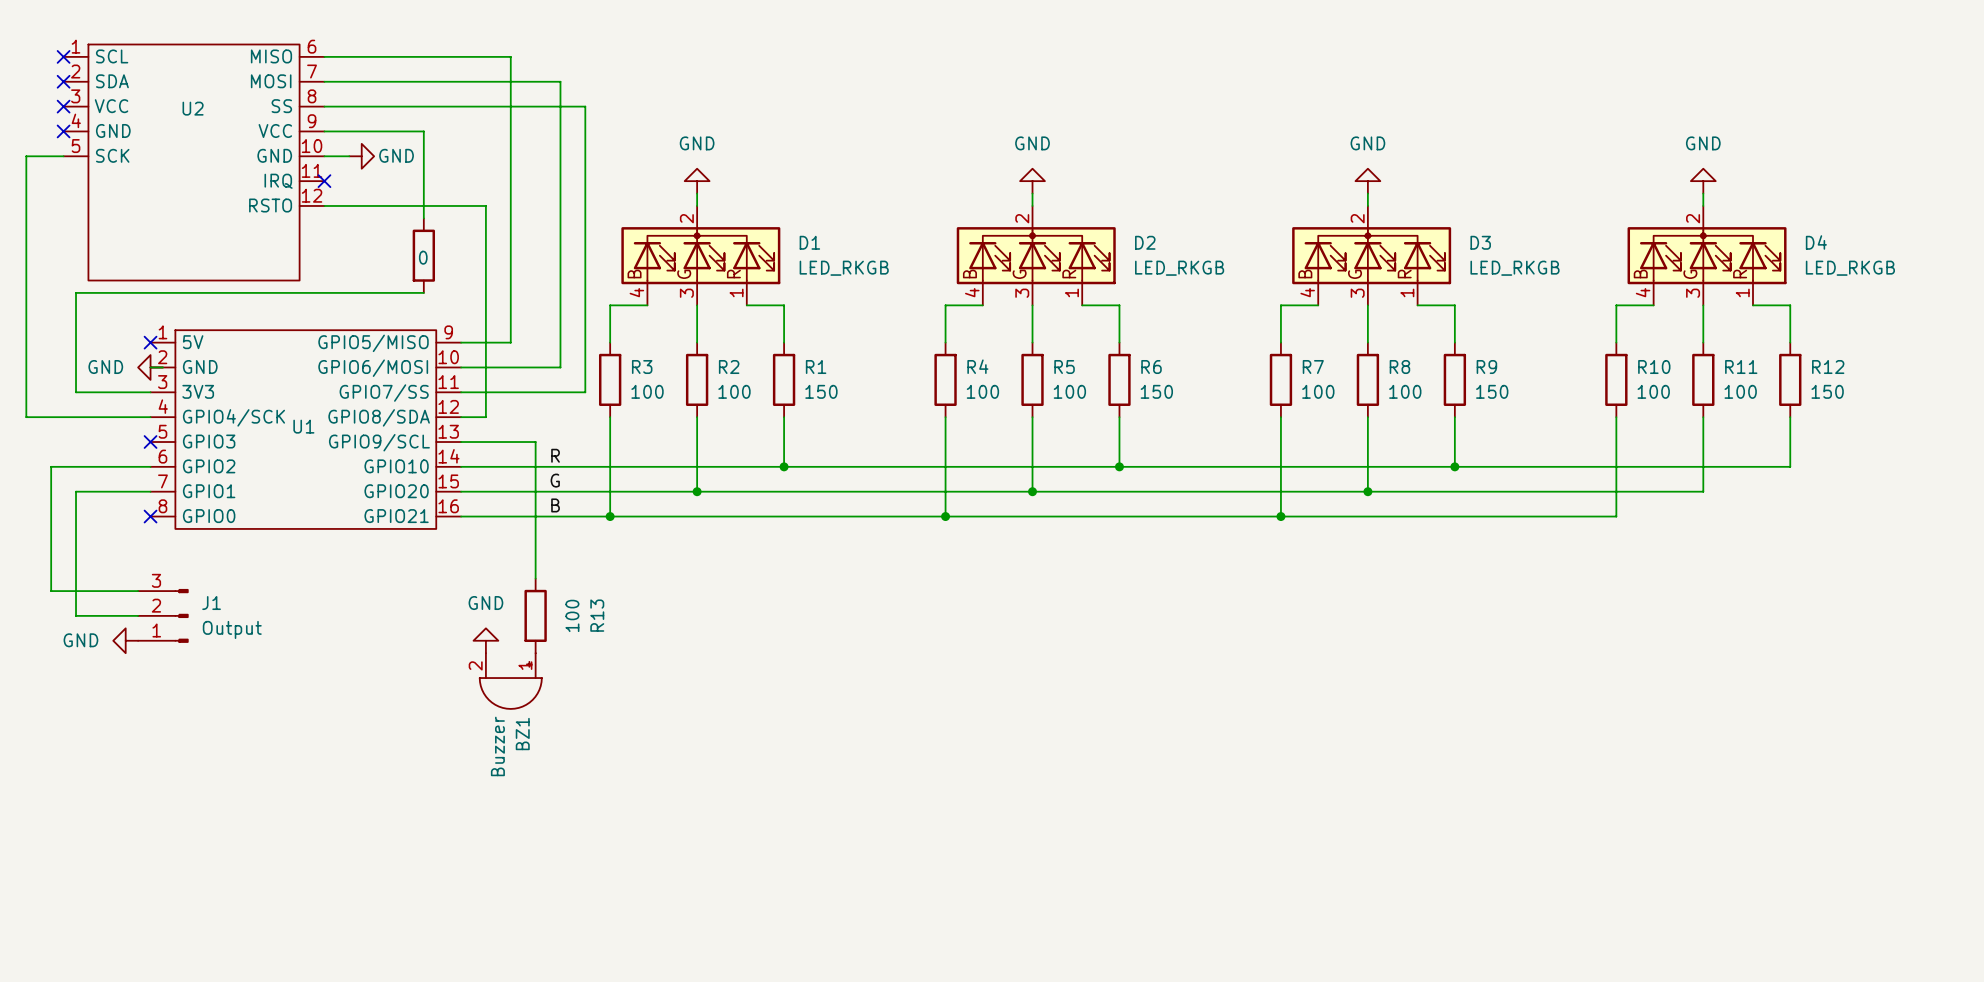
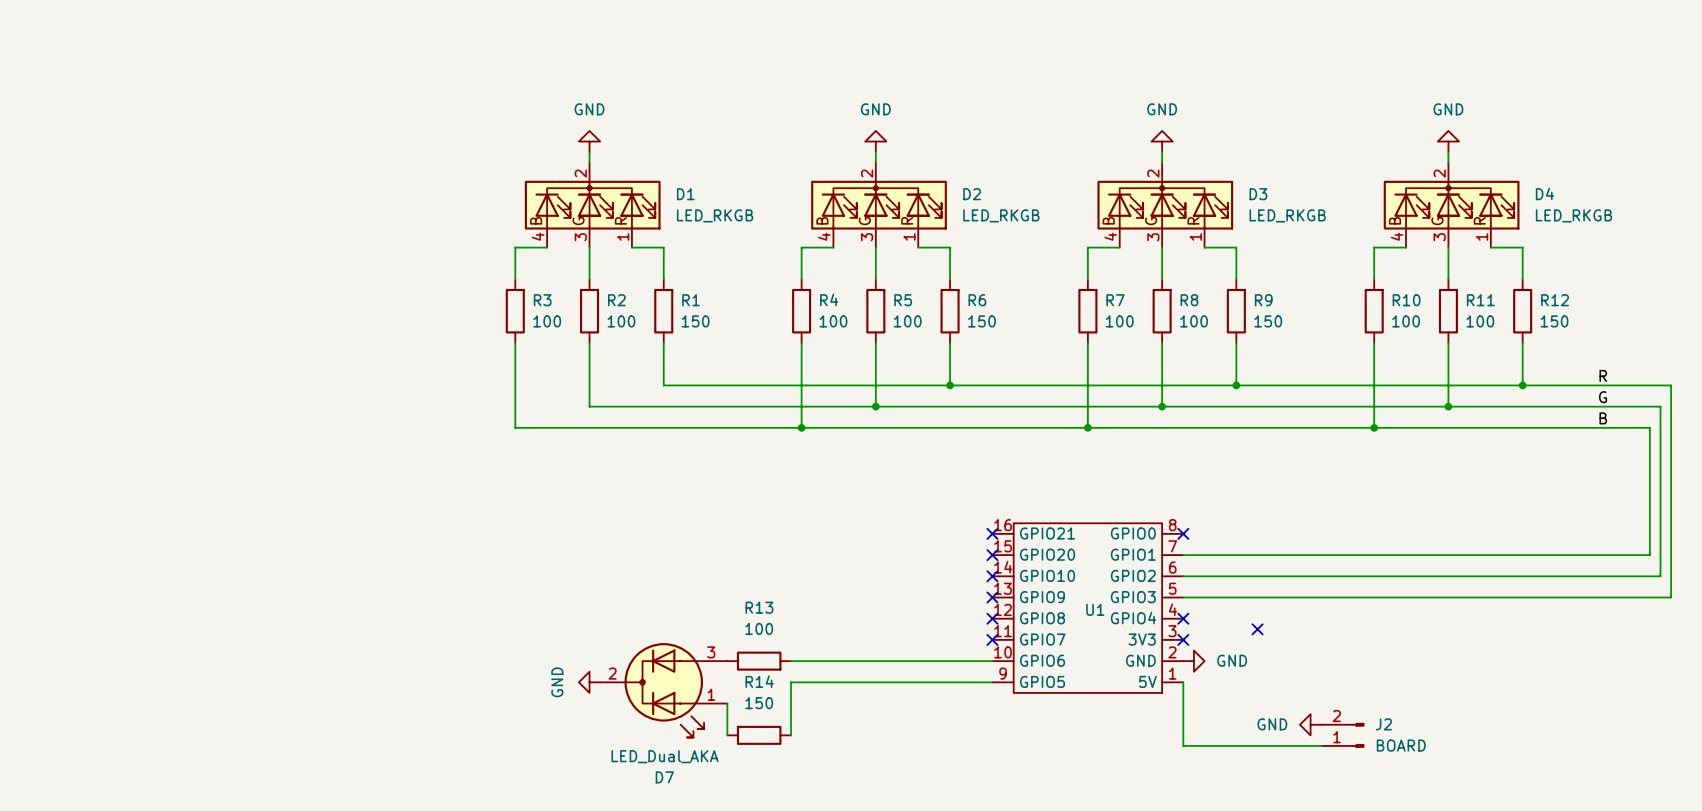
no-connect mark: (63, 56) -> none
wire: (324, 56) (510, 56) (510, 342) (461, 342) -> none
no-connect mark: (63, 81) -> none
wire: (324, 81) (560, 81) (560, 367) (461, 367) -> none
no-connect mark: (63, 106) -> none
wire: (324, 106) (585, 106) (585, 392) (461, 392) -> none
no-connect mark: (63, 131) -> none
wire: (324, 131) (423, 131) (423, 218) -> none
wire: (63, 156) (26, 156) (26, 417) (150, 417) -> none
wire: (324, 156) (349, 156) -> none
power symbol: GND (361, 156) -> none
U2: (194, 162) -> none
no-connect mark: (324, 181) -> none
wire: (324, 205) (485, 205) (485, 417) (461, 417) -> none
part: 0 (423, 255) -> none
wire: (423, 292) (76, 292) (76, 392) (150, 392) -> none
U1 symbol: [150, 330, 462, 529] -> [992, 523, 1184, 693]
no-connect mark: (150, 342) -> none
wire: (150, 367) (162, 367) -> none
power symbol: GND (150, 367) -> none
no-connect mark: (150, 442) -> none
wire: (461, 442) (535, 442) (535, 578) -> none
label: R (555, 455) -> none
label: none -> R (1603, 375)
wire: (150, 466) (51, 466) (51, 591) (138, 591) -> none
wire: (461, 466) (784, 466) -> none
junction: (784, 466) -> none
wire: none -> (1522, 385) (1671, 385) (1671, 597) (1183, 597)
junction: none -> (1522, 385)
label: G (555, 480) -> none
label: none -> G (1603, 397)
wire: (150, 491) (76, 491) (76, 615) (138, 615) -> none
wire: (461, 491) (697, 491) -> none
junction: (697, 491) -> none
wire: none -> (1448, 406) (1660, 406) (1660, 576) (1183, 576)
junction: none -> (1448, 406)
label: B (555, 505) -> none
label: none -> B (1603, 418)
no-connect mark: (150, 516) -> none
wire: (461, 516) (610, 516) -> none
junction: (610, 516) -> none
wire: none -> (1374, 427) (1649, 427) (1649, 555) (1183, 555)
junction: none -> (1374, 427)
J1: Output (163, 615) -> none
R13 rotation: 0° (535, 615) -> 90° clockwise (759, 661)
R13 position: (535, 615) -> (759, 661)
R13 value position: 100 (572, 615) -> 100 (759, 628)
R13 name position: R13 (597, 615) -> R13 (759, 607)
power symbol: GND (125, 640) -> none
power symbol: GND (485, 640) -> none
no-connect mark: none -> (992, 533)
no-connect mark: none -> (1183, 533)
no-connect mark: none -> (992, 555)
BZ1: Buzzer (510, 681) -> none
no-connect mark: none -> (992, 576)
no-connect mark: none -> (992, 597)
no-connect mark: none -> (992, 618)
no-connect mark: none -> (1183, 618)
no-connect mark: none -> (1257, 629)
no-connect mark: none -> (992, 639)
no-connect mark: none -> (1183, 639)
wire: none -> (791, 661) (992, 661)
power symbol: none -> GND (1193, 661)
power symbol: none -> GND (589, 682)
wire: none -> (992, 682) (791, 682) (791, 735)
wire: none -> (1183, 682) (1183, 745) (1321, 745)
D7: none -> LED_Dual_AKA (663, 690)
wire: none -> (727, 703) (727, 735)
power symbol: none -> GND (1310, 724)
R14: none -> 150 (759, 735)
J2: none -> BOARD (1342, 735)

